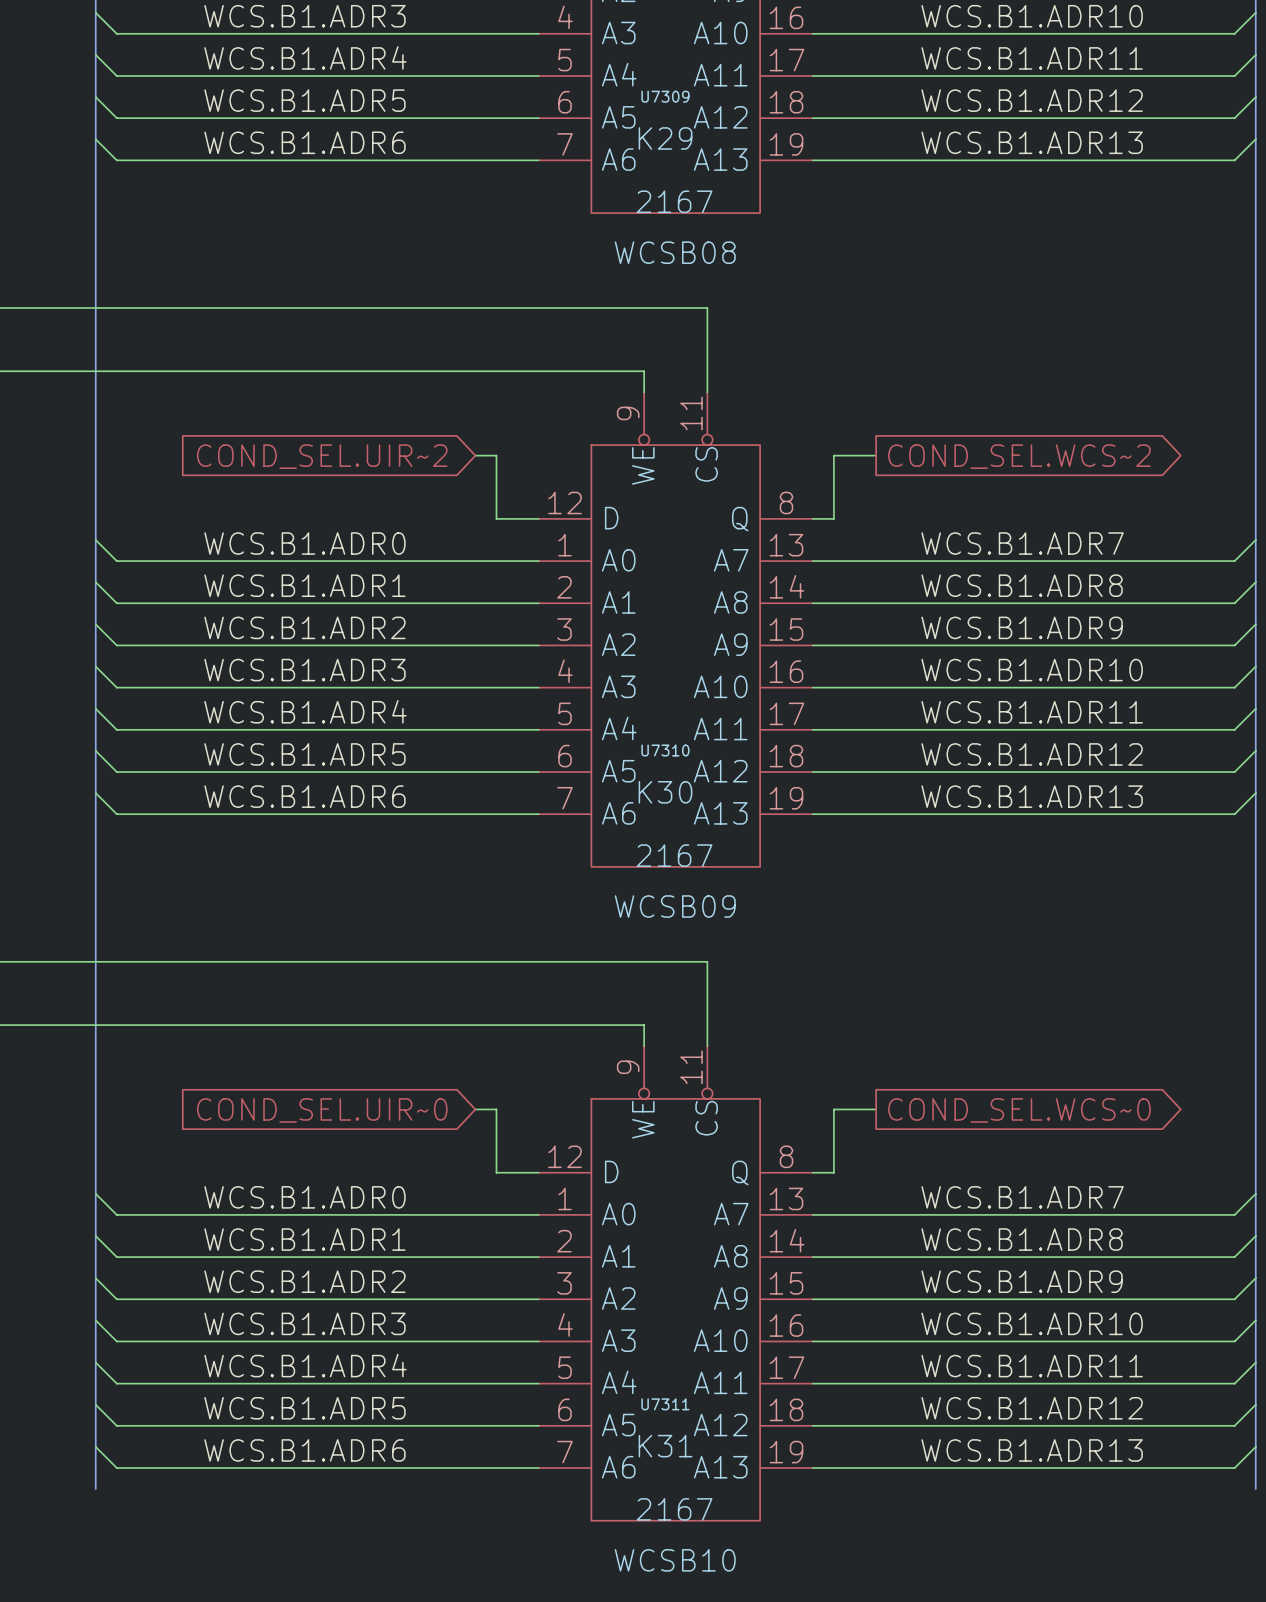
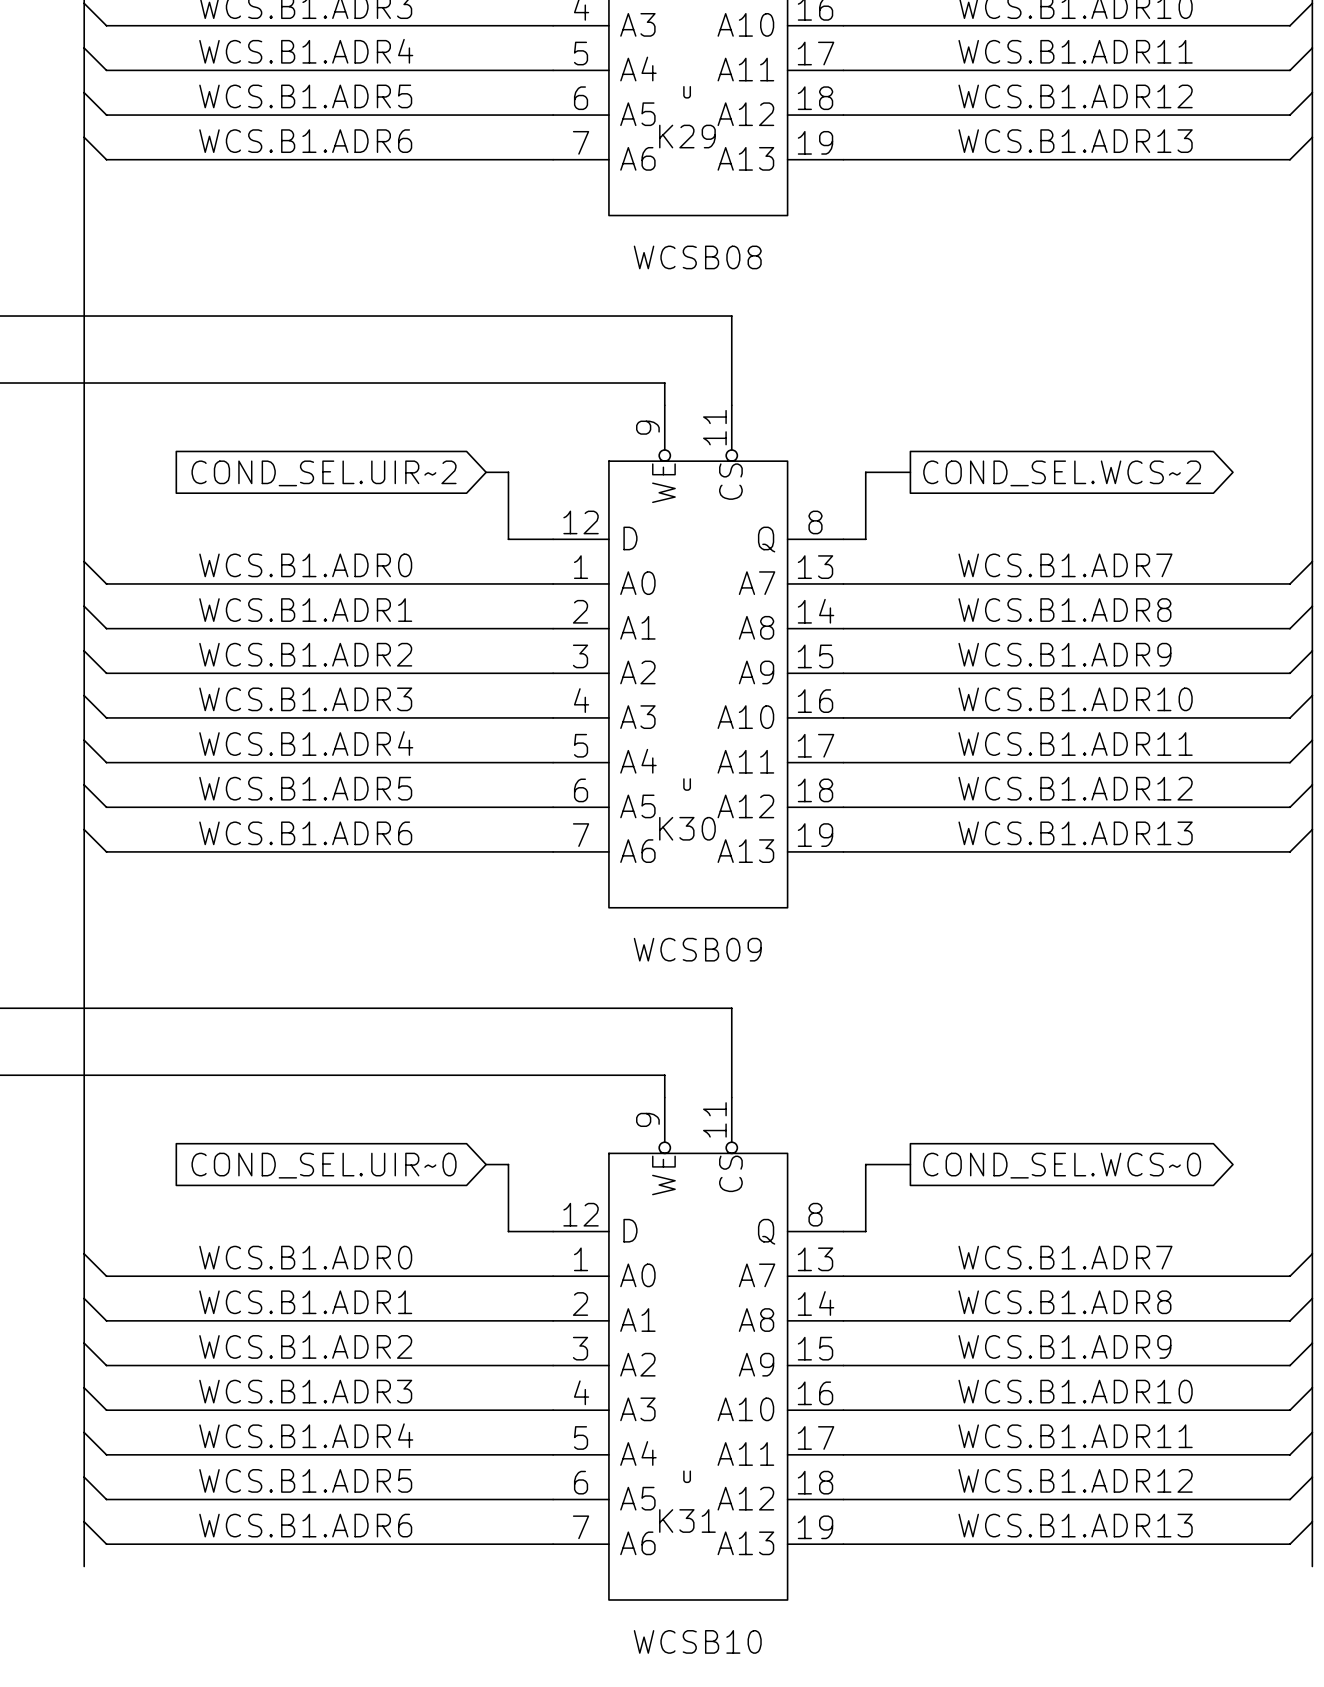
U7309 name: U7309 (665, 96) -> U (687, 92)
U7309 value: 2167 (674, 201) -> none
U7310 name: U7310 (665, 750) -> U (687, 784)
U7310 value: 2167 (674, 855) -> none
U7311 name: U7311 (665, 1404) -> U (687, 1476)
U7311 value: 2167 (674, 1509) -> none

